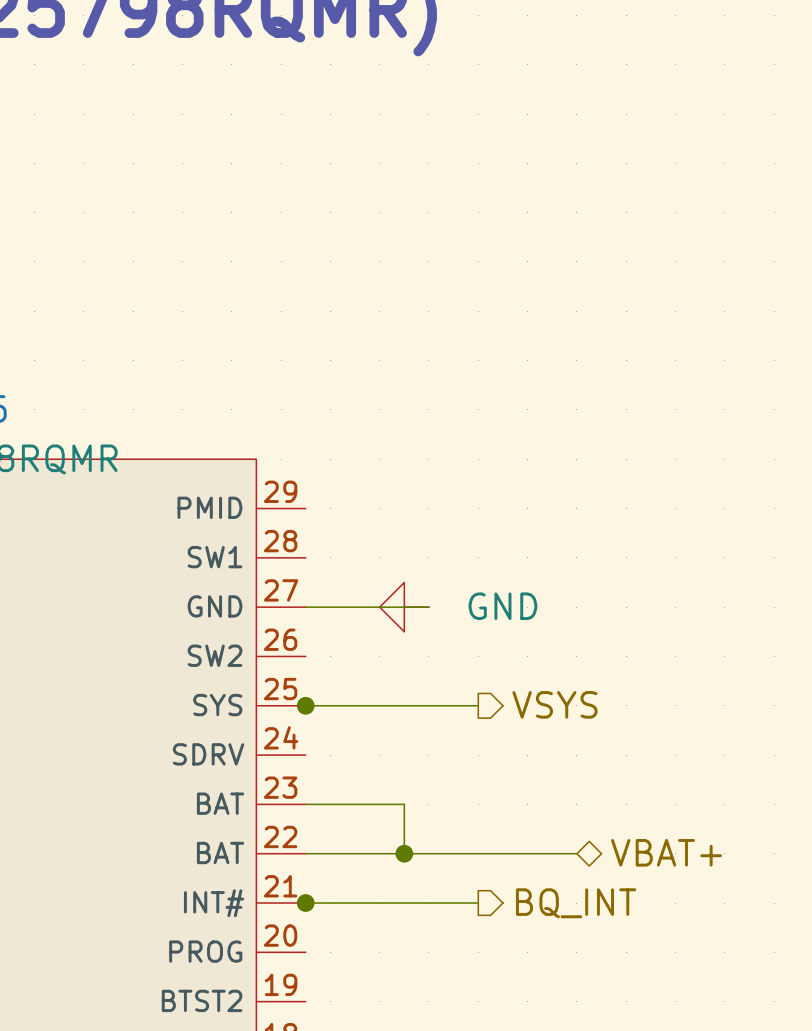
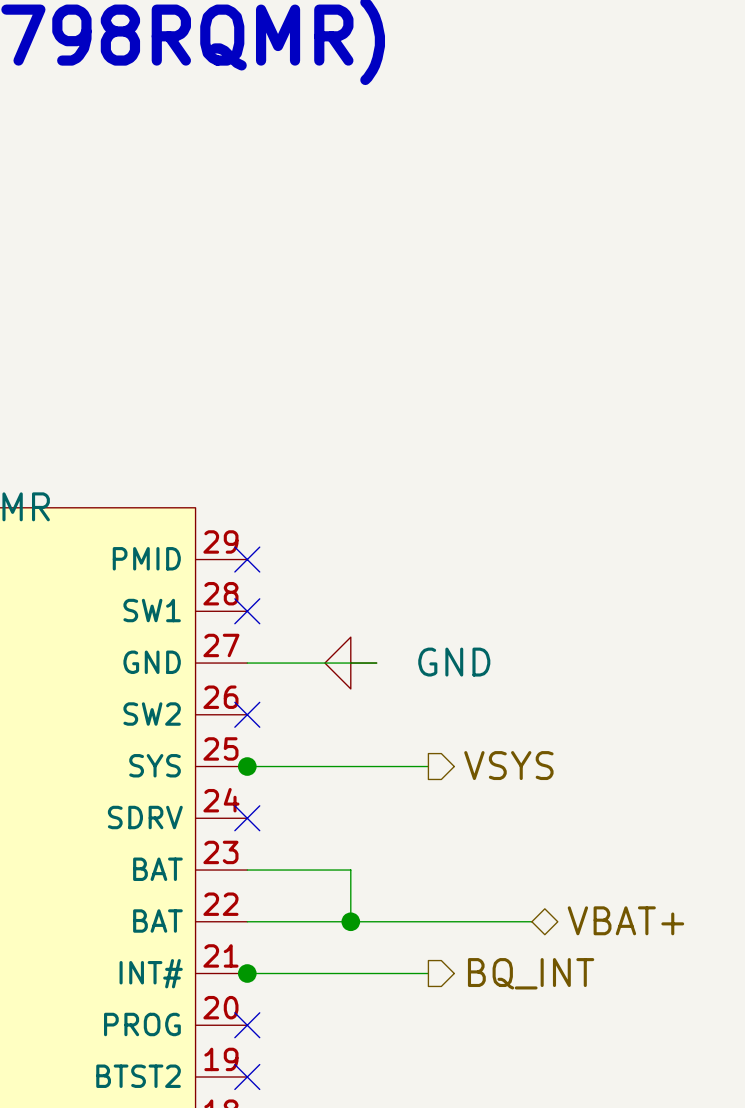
no-connect mark: none -> (247, 559)
no-connect mark: none -> (247, 611)
no-connect mark: none -> (247, 714)
no-connect mark: none -> (247, 818)
no-connect mark: none -> (247, 1025)
no-connect mark: none -> (247, 1077)

